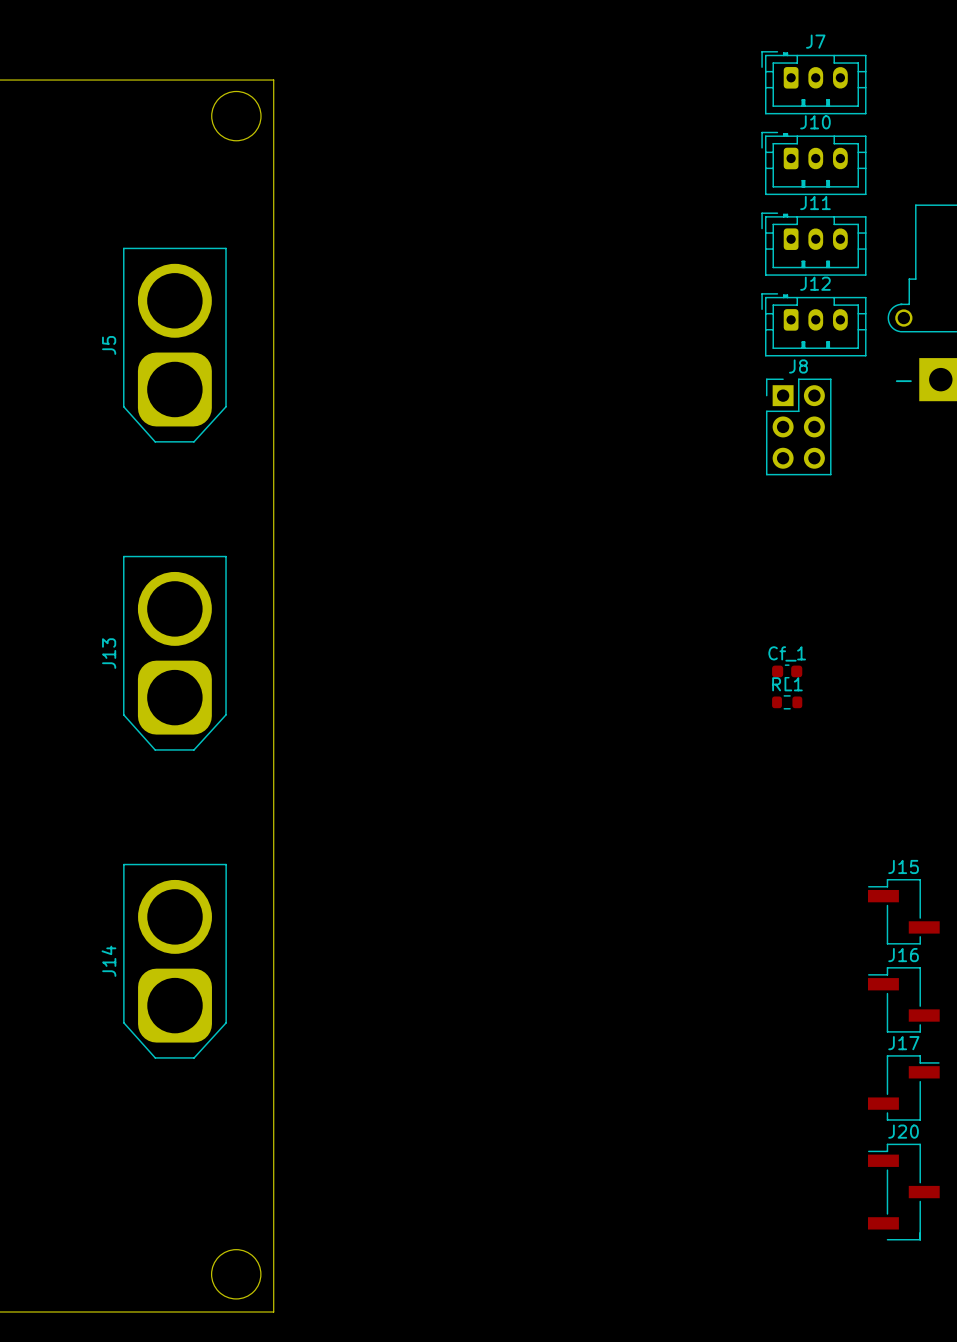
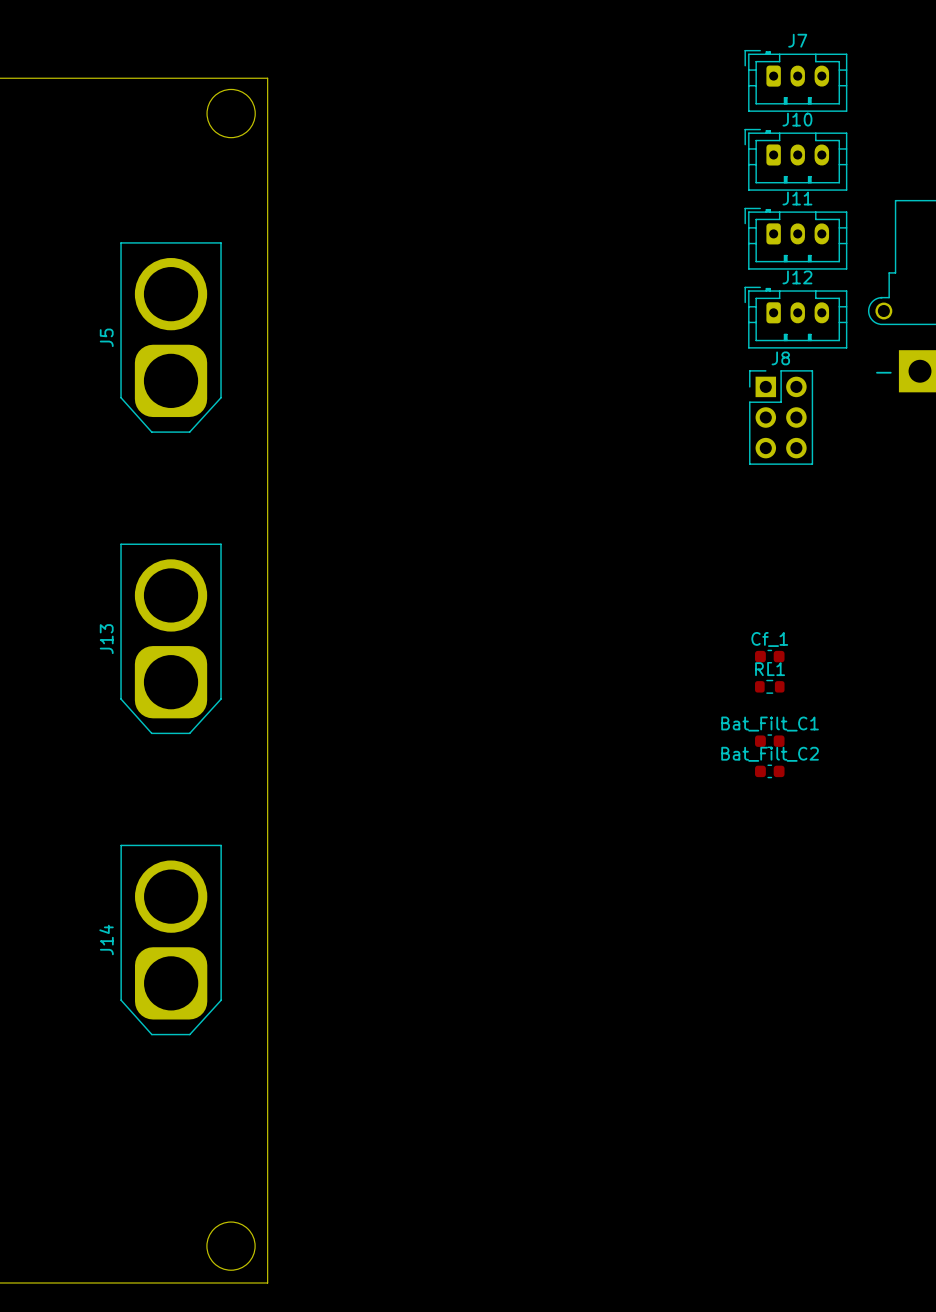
Bat_Filt_C1: none -> (769, 741)
Bat_Filt_C2: none -> (769, 771)
J15: (903, 911) -> none
J16: (903, 999) -> none
J17: (903, 1087) -> none
J20: (903, 1192) -> none

